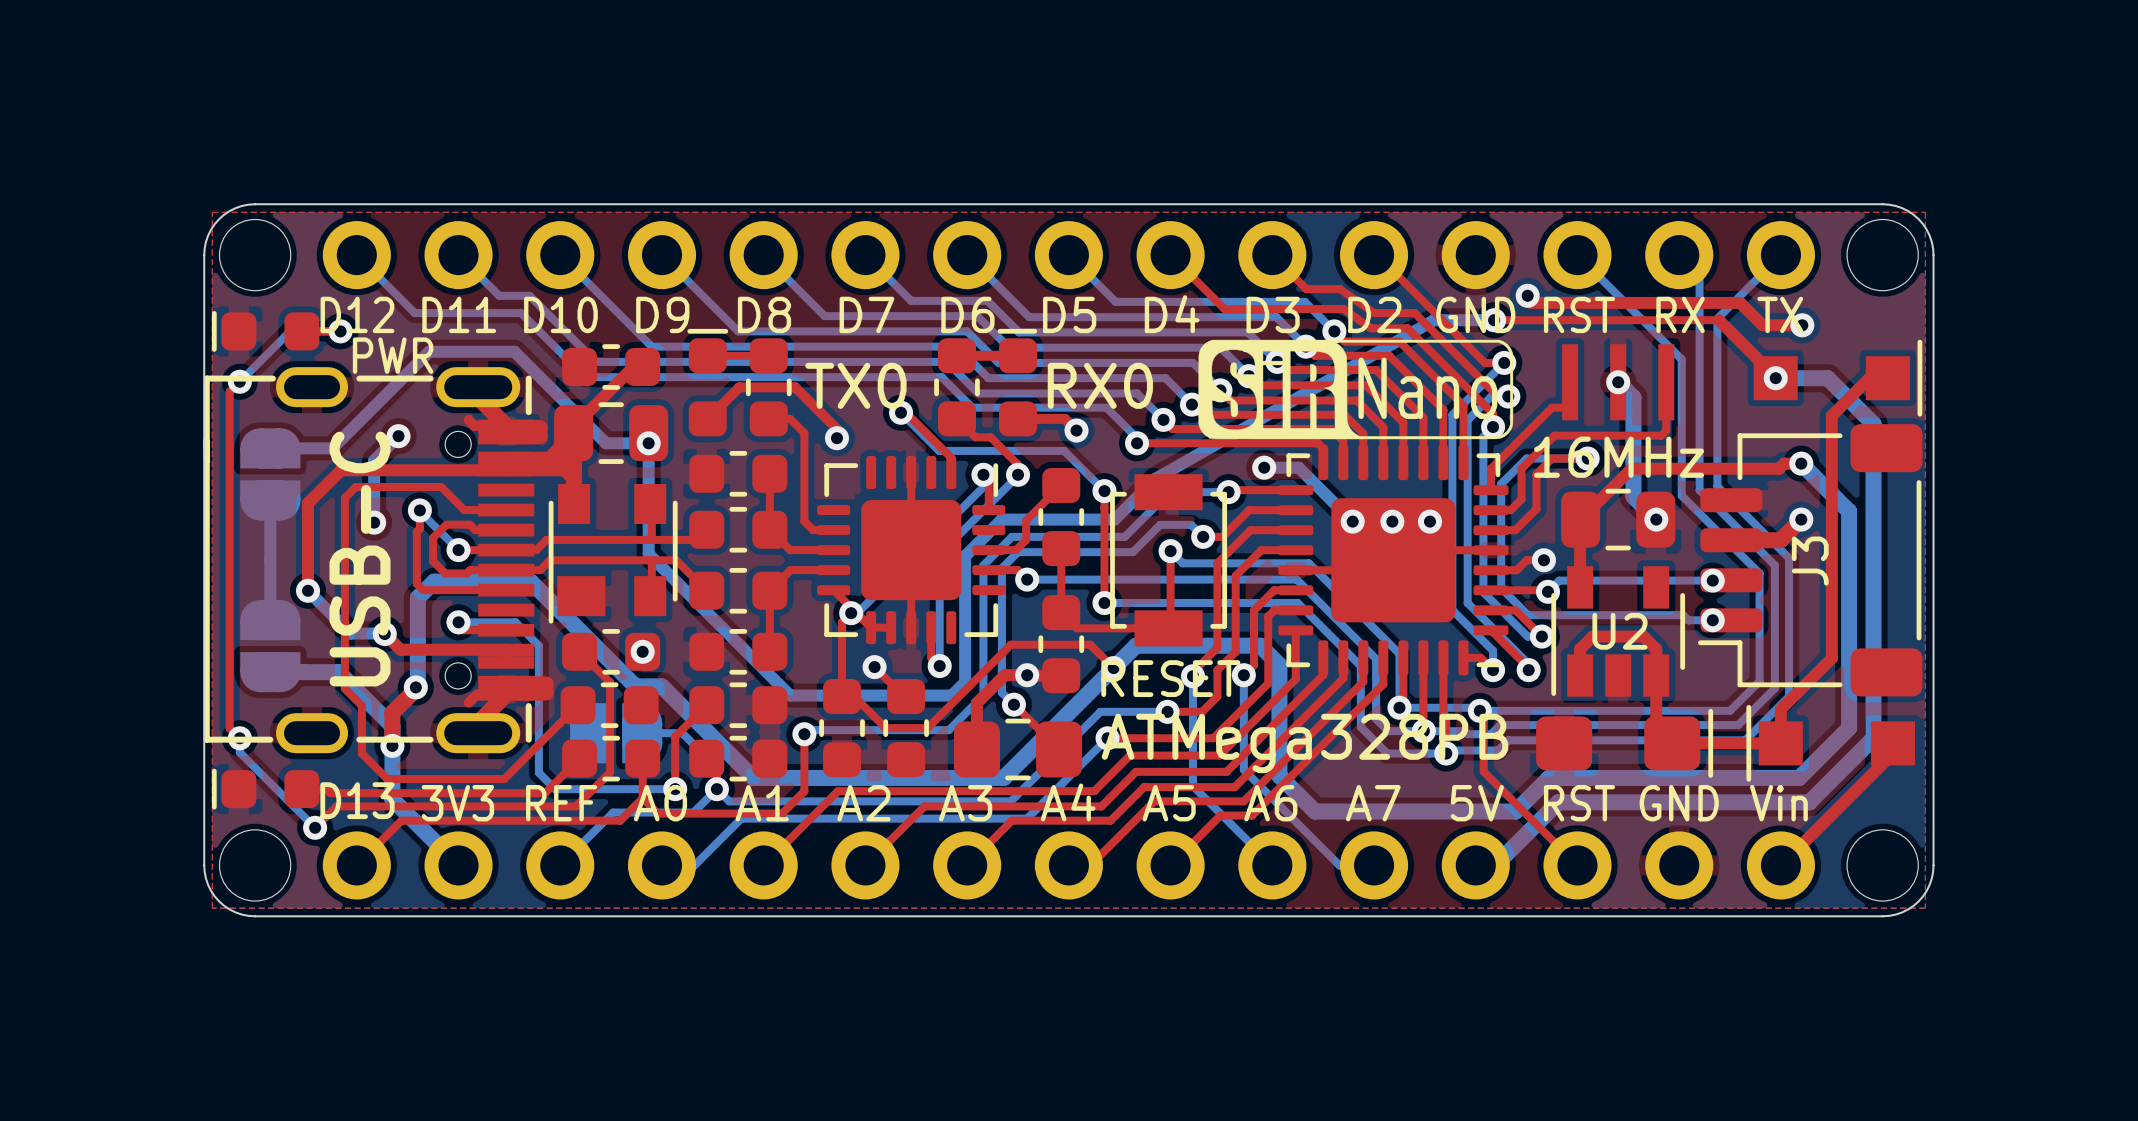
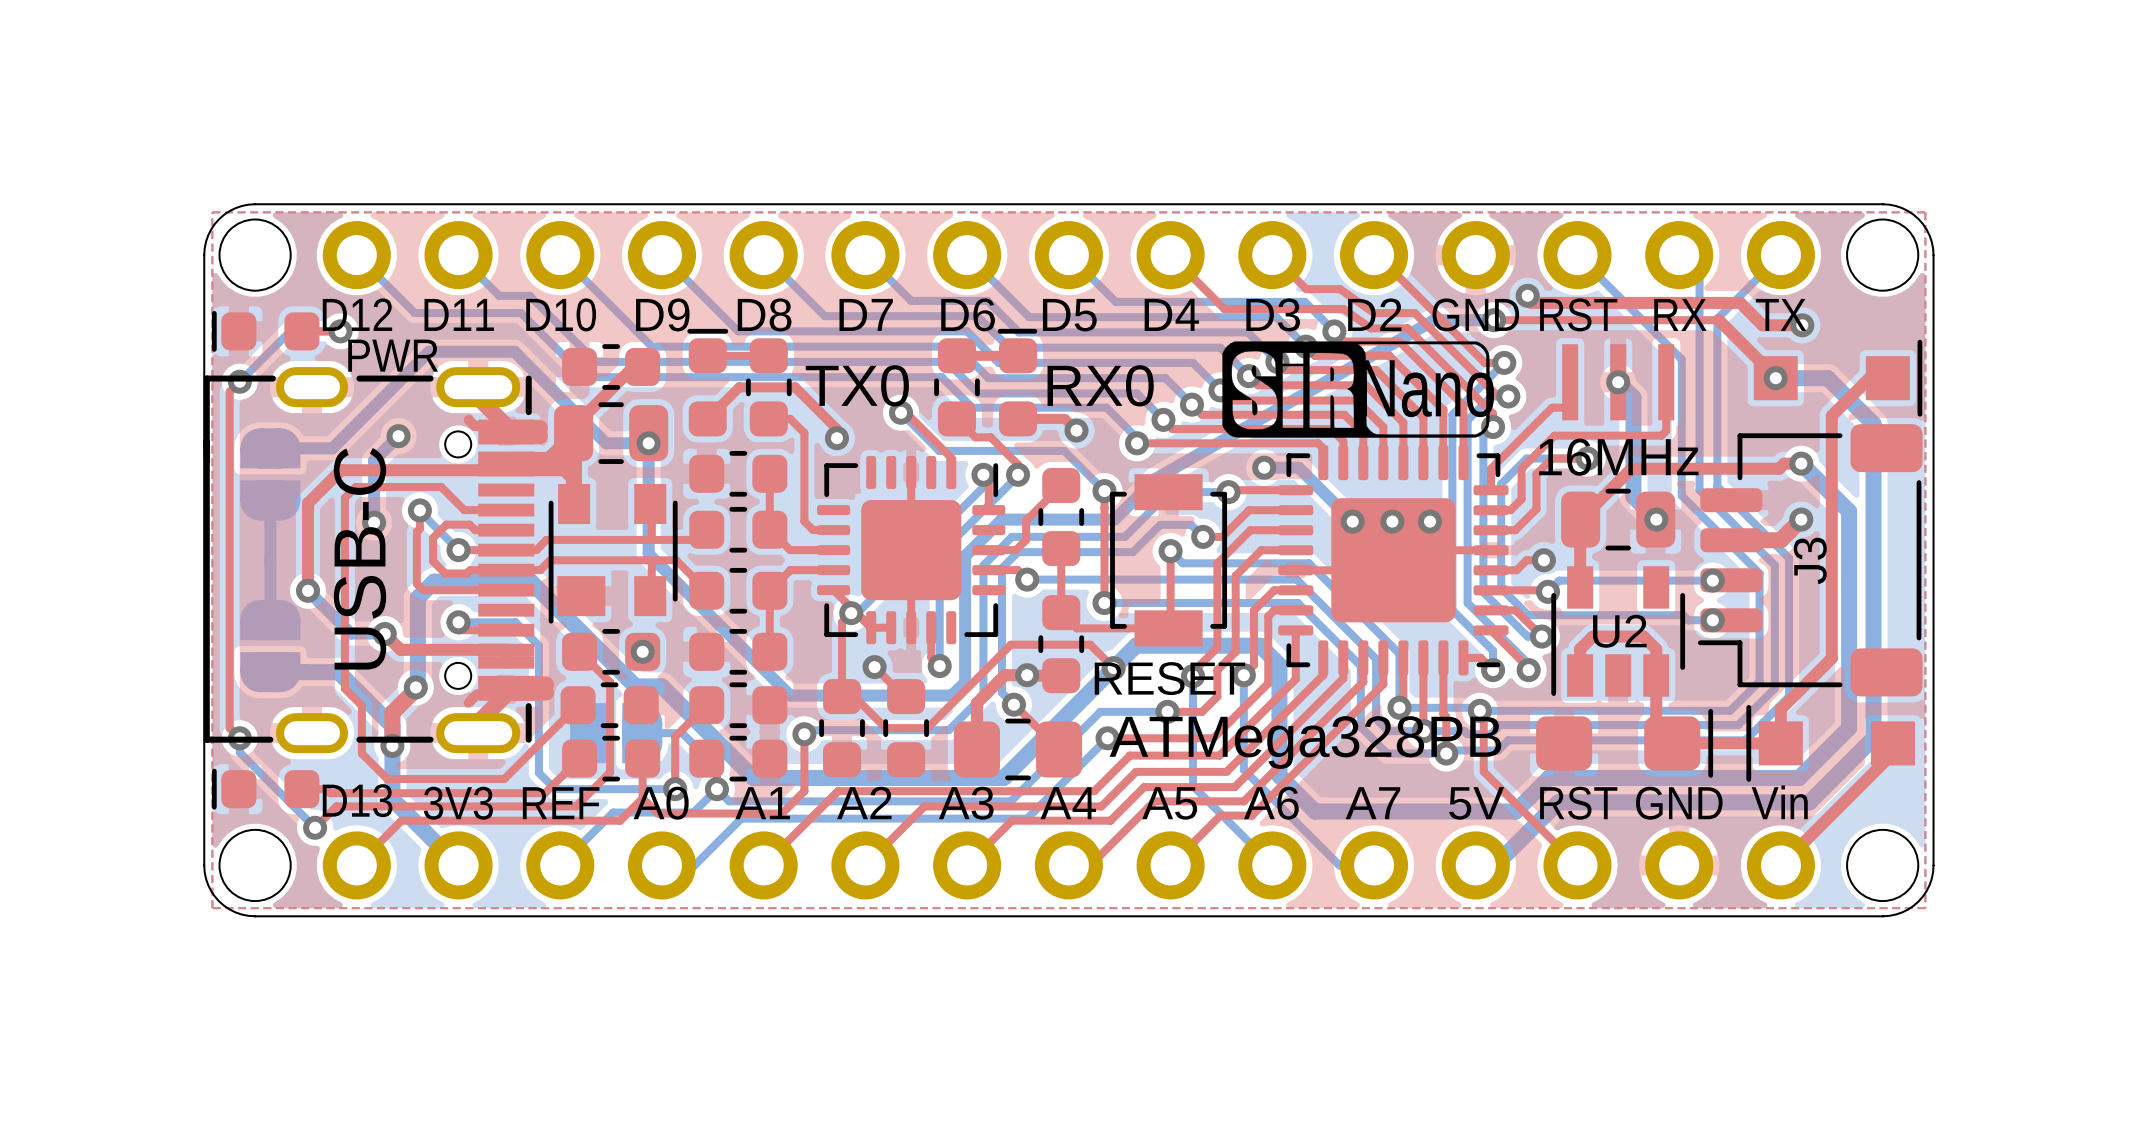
drawing shape: [1198, 339, 1514, 440] -> [1222, 341, 1490, 438]

